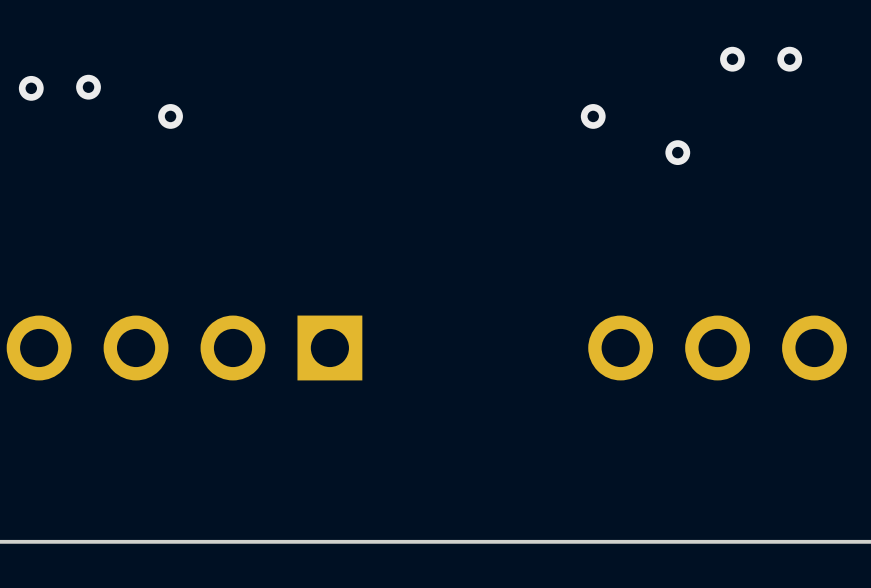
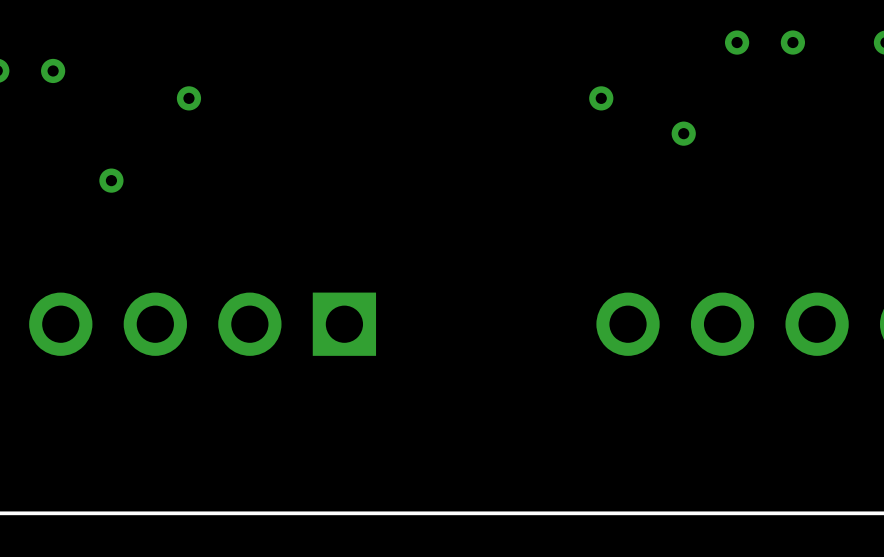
via position: (88, 87) -> (111, 180)

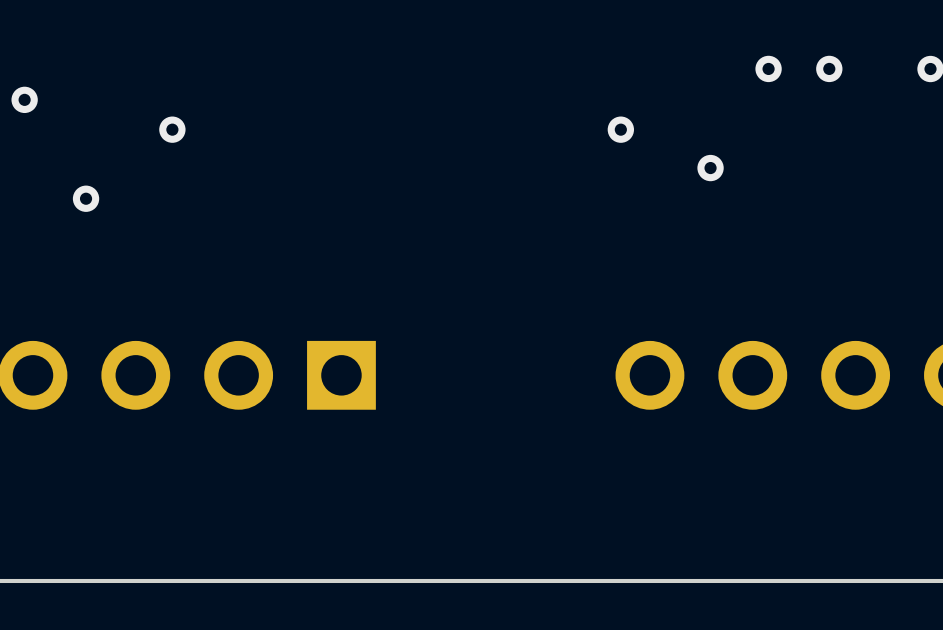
via position: (111, 180) -> (86, 198)

